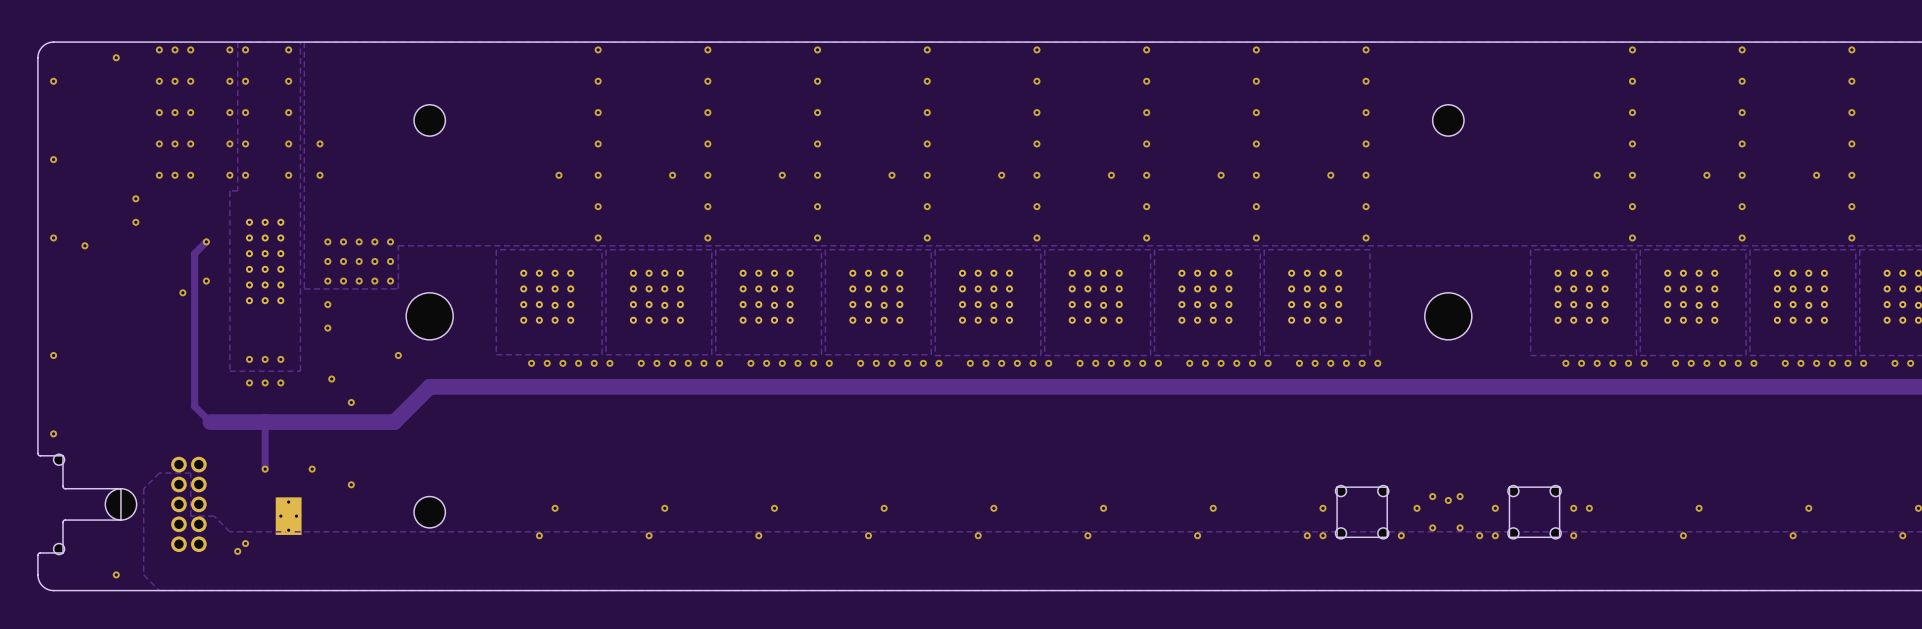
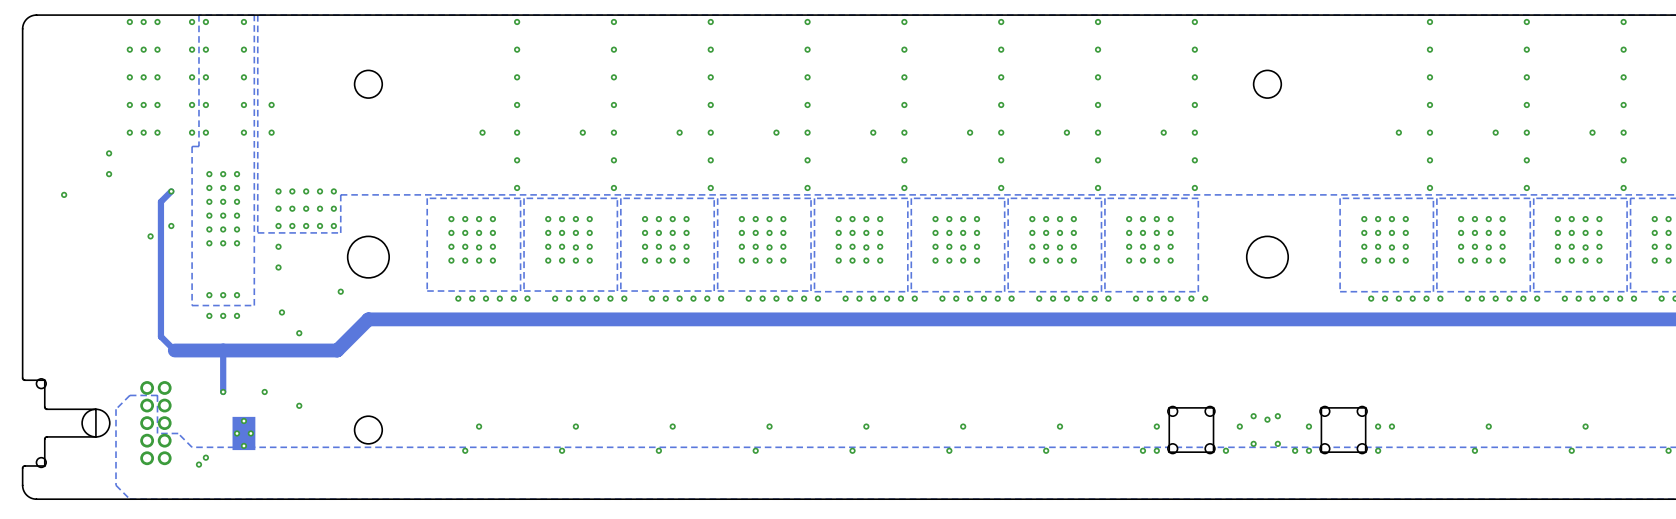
via: (116, 57) -> none
via: (53, 81) -> none
via: (53, 159) -> none
via: (53, 237) -> none
via: (53, 355) -> none
via: (53, 433) -> none
via: (116, 574) -> none

